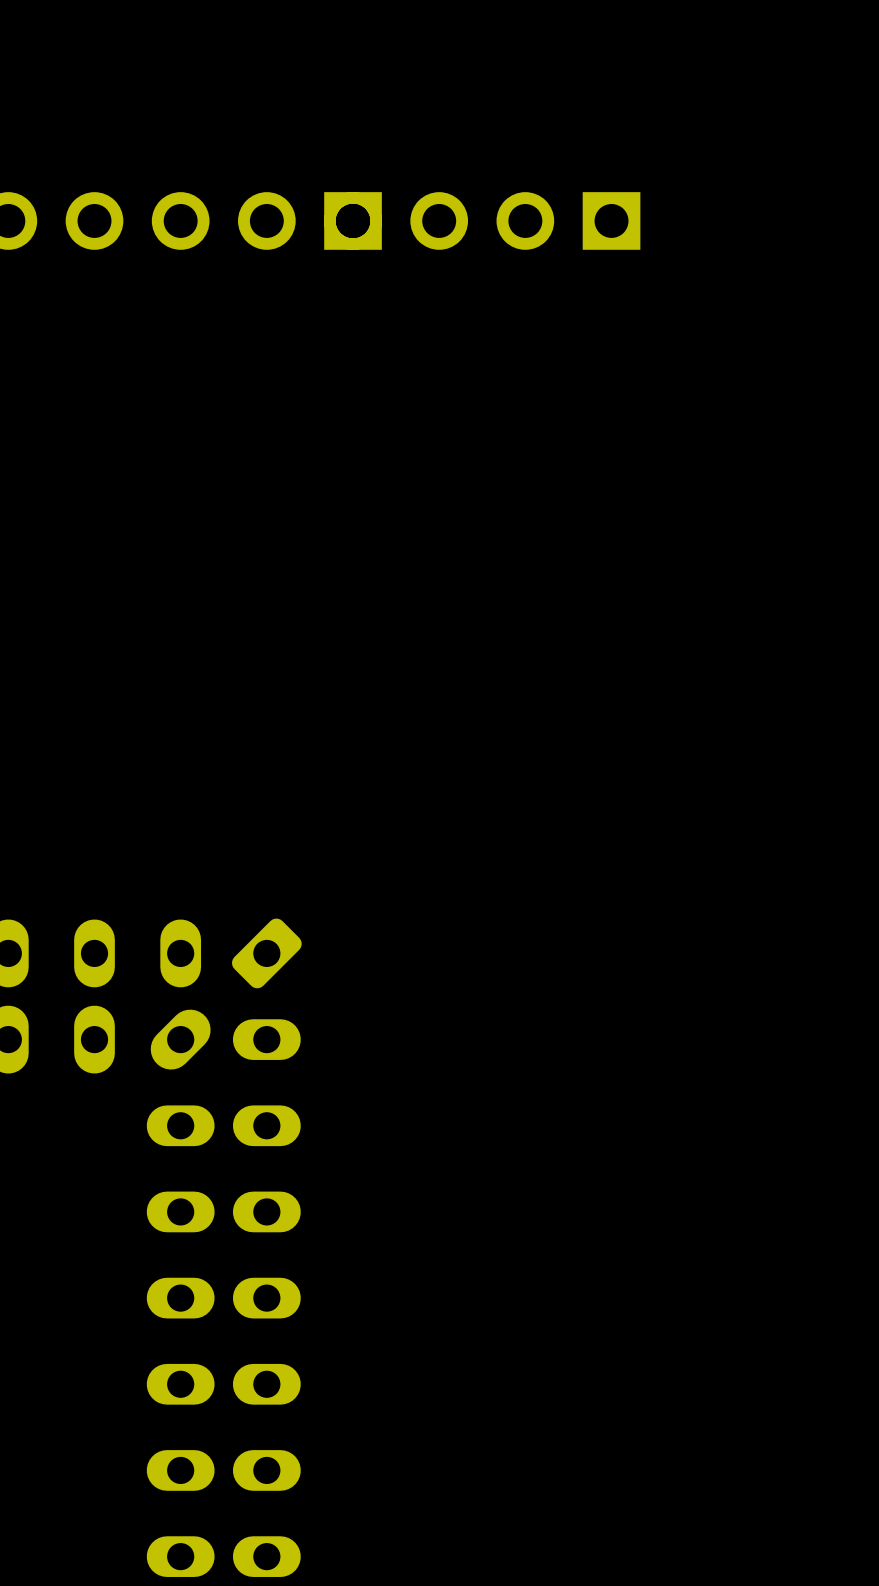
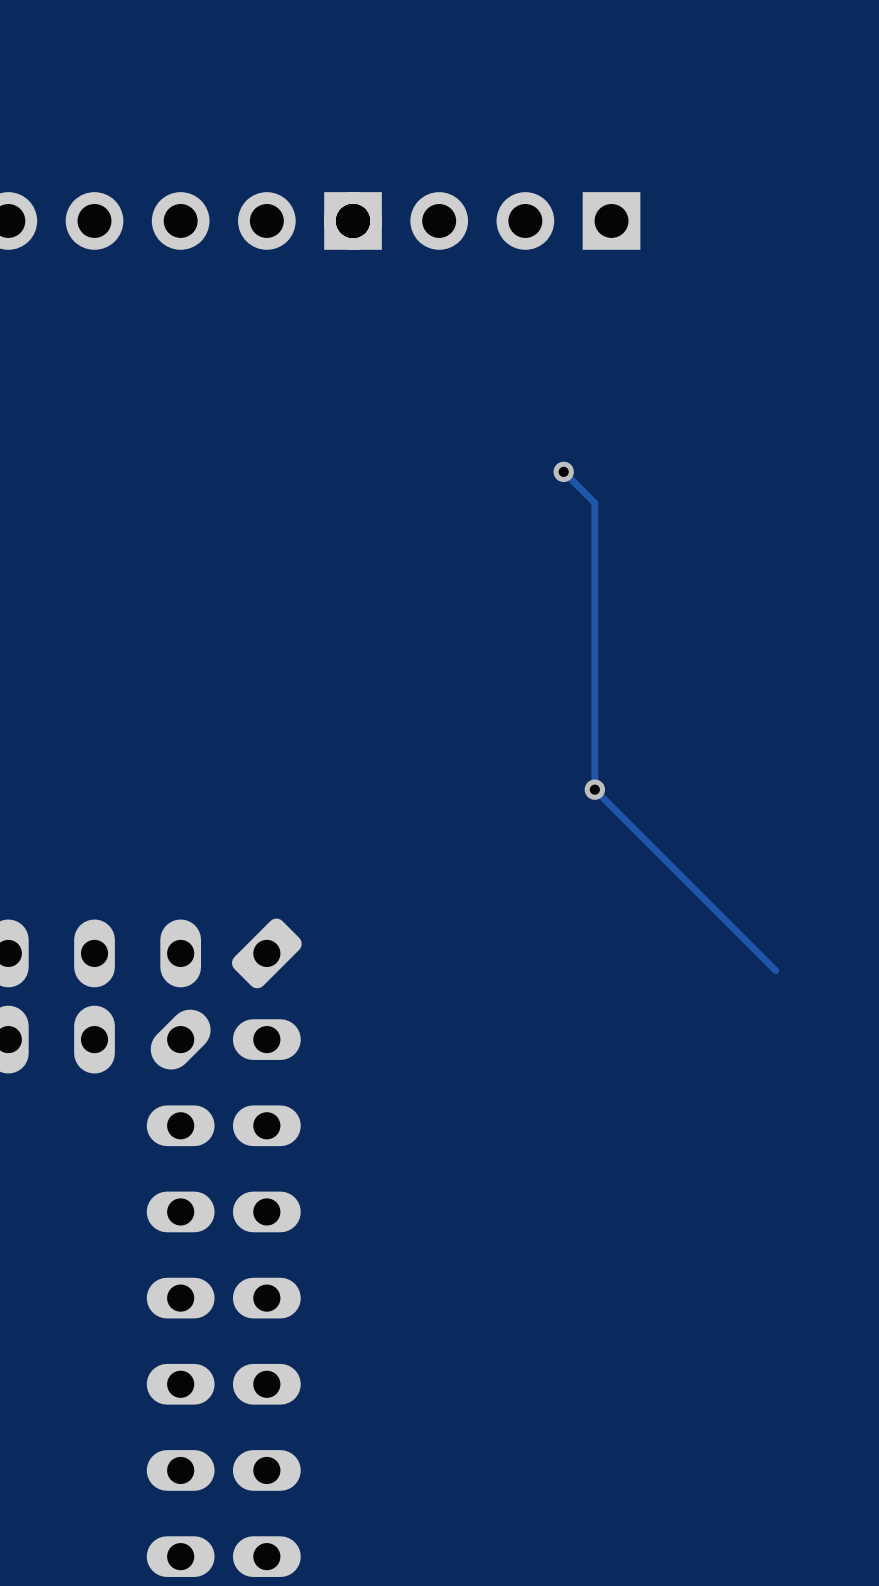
track: none -> (563, 471) (594, 502) (594, 789) (775, 970)
via: none -> (563, 471)
via: none -> (594, 789)

